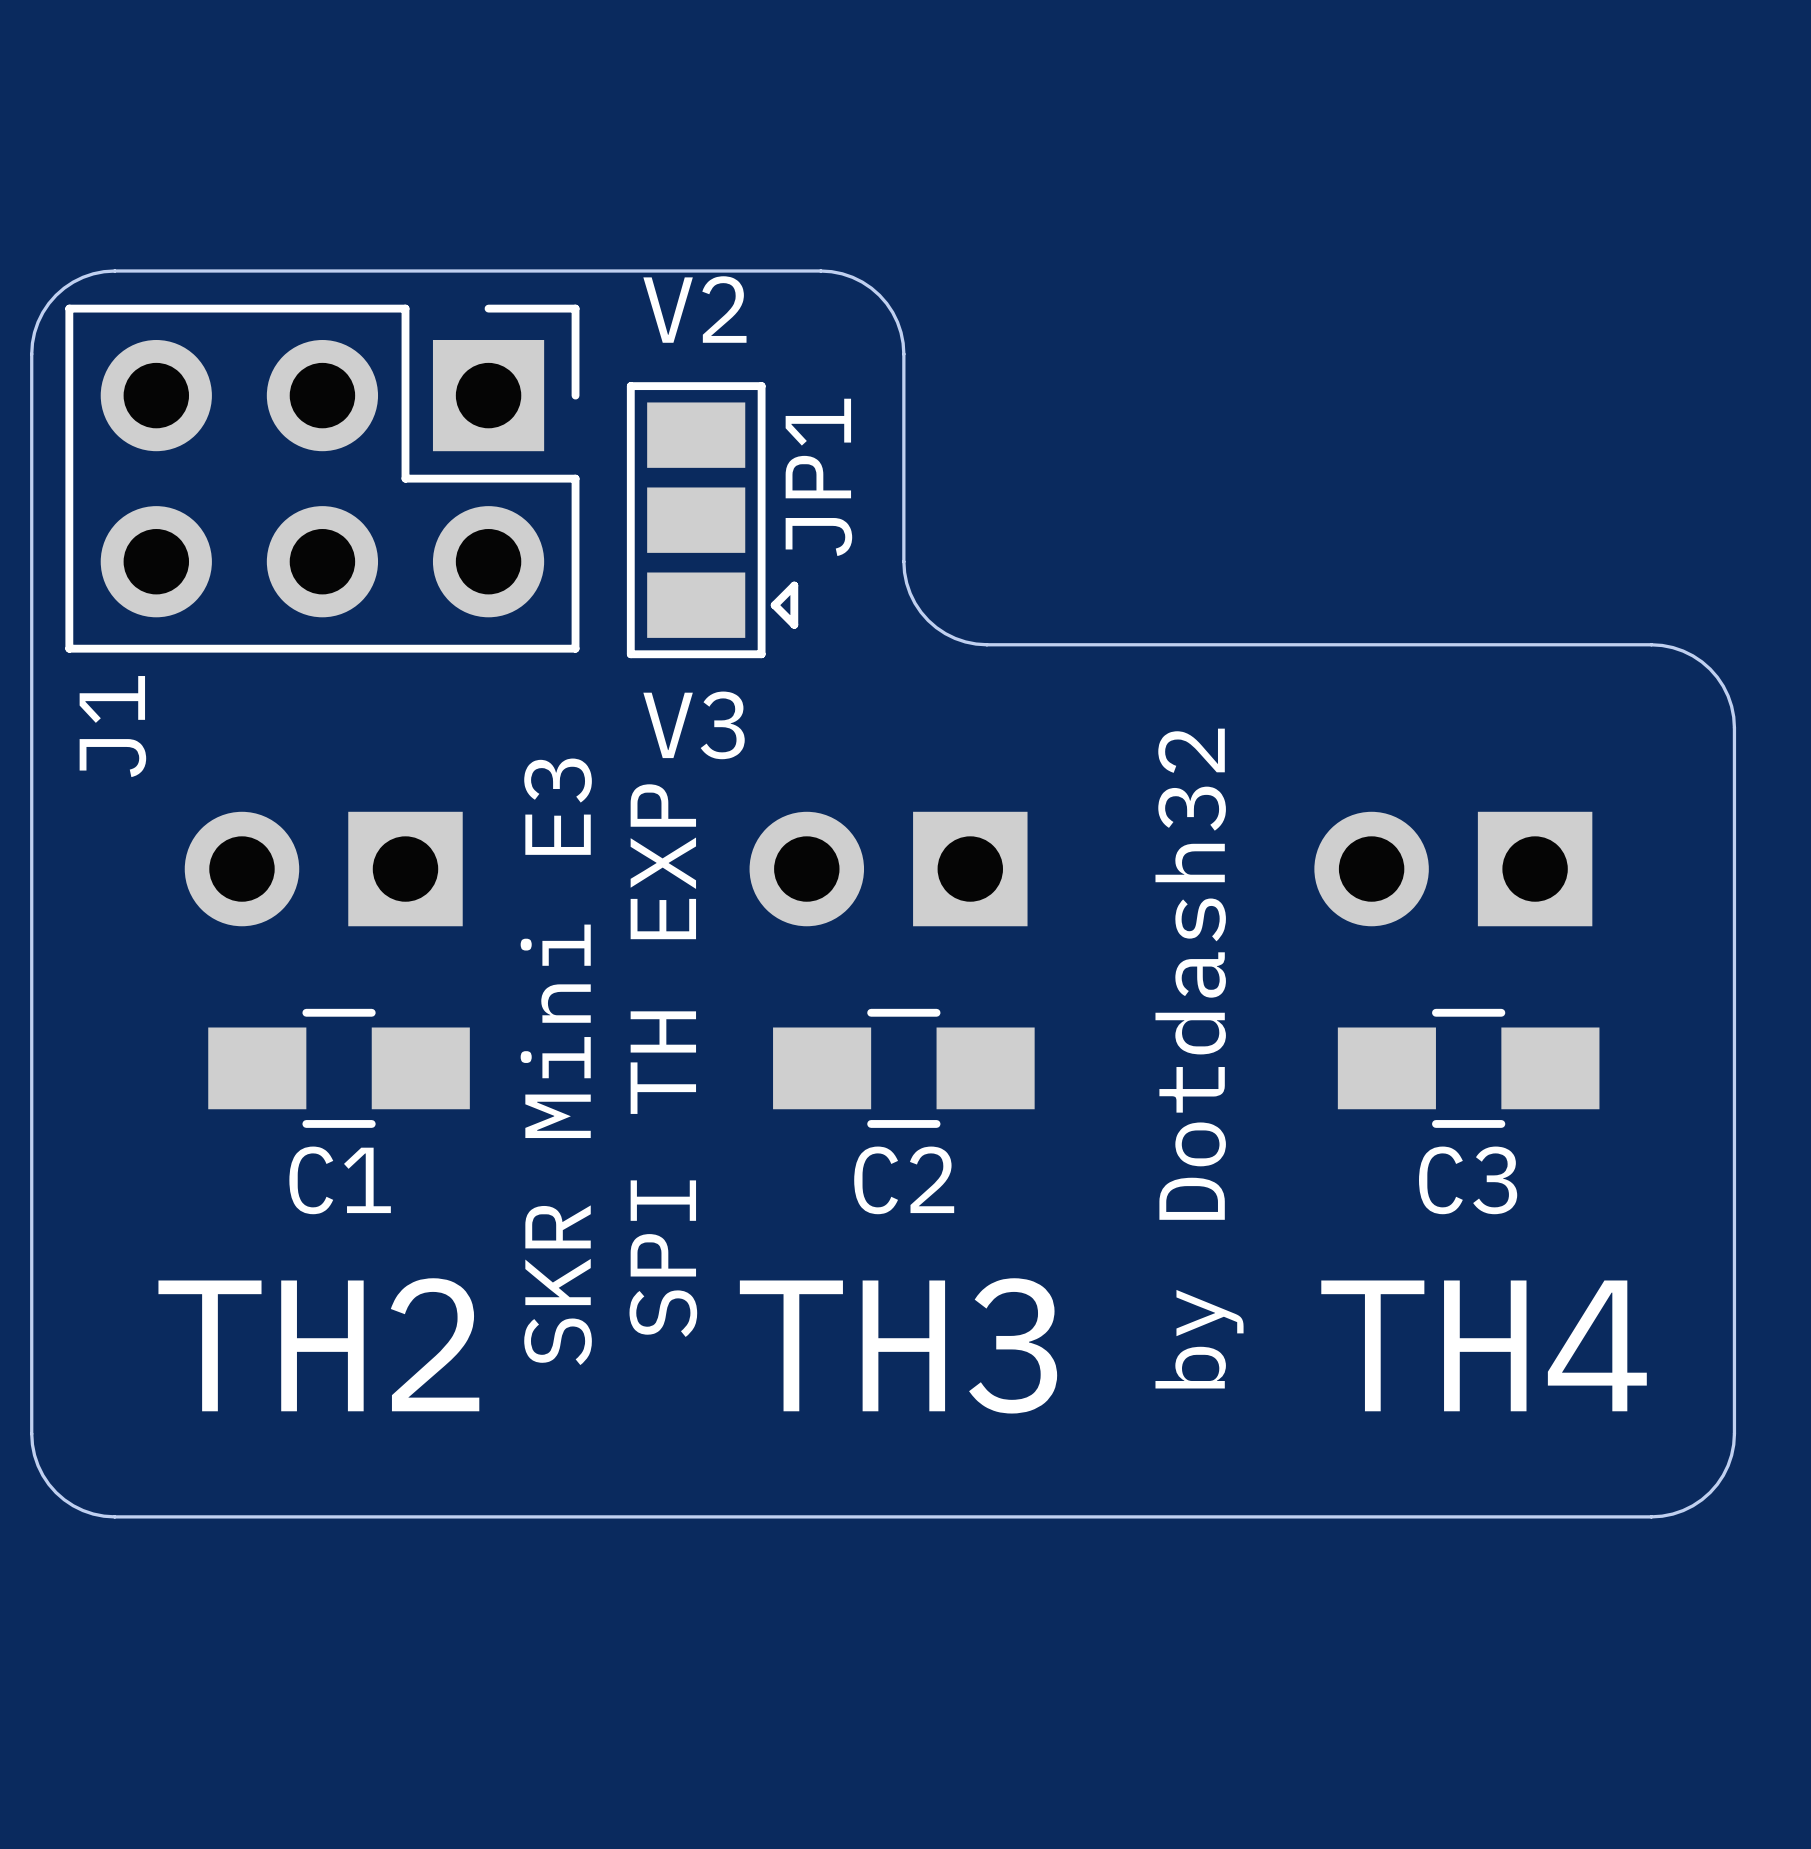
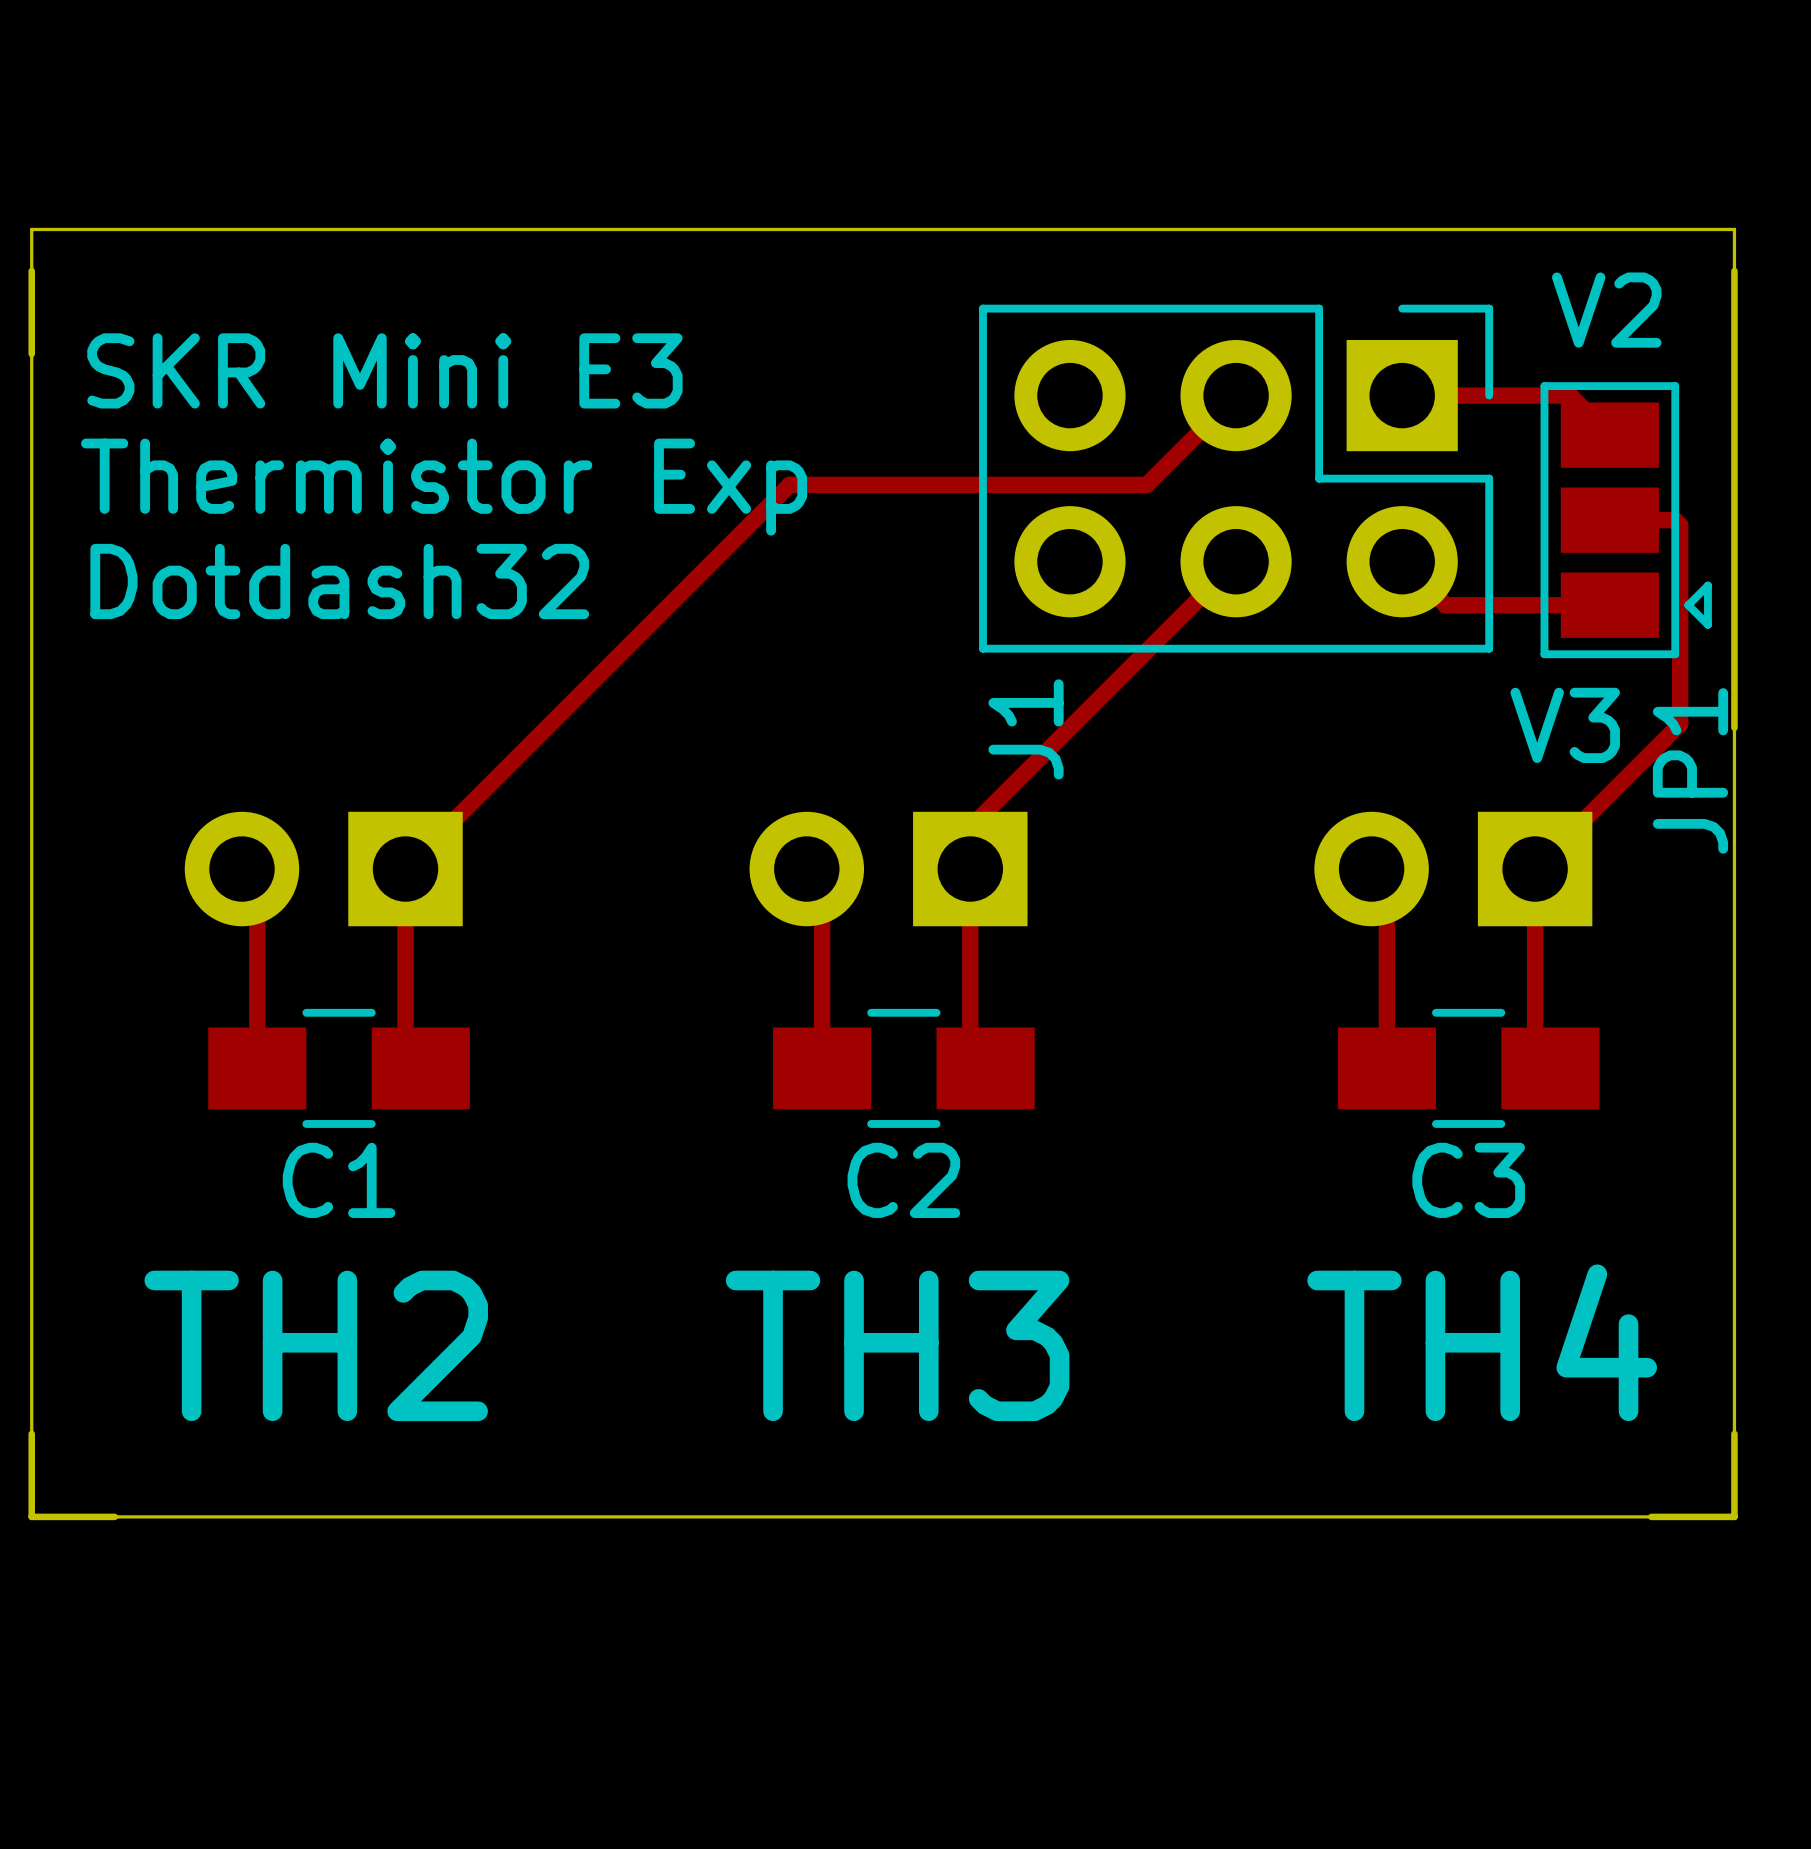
text position: V2 (694, 309) -> V2 (1606, 310)
board edge: (31, 354) (34, 332) (48, 303) (73, 282) (103, 271) (820, 271) (842, 273) (862, 282) (879, 295) (892, 312) (901, 332) (903, 354) (904, 572) (914, 603) (928, 620) (945, 633) (965, 641) (986, 644) (1662, 645) (1692, 655) (1717, 677) (1731, 706) (1734, 727) -> (31, 354) (31, 229) (1734, 229) (1734, 727)
track: none -> (1236, 395) (1146, 484) (789, 484) (405, 869) (405, 1053) (420, 1068)
track: none -> (1402, 395) (1570, 395) (1609, 435)
JP1 name position: JP1 (818, 477) -> JP1 (1690, 770)
J1 position: (322, 478) -> (1236, 478)
text: none -> Thermistor Exp (444, 487)
JP1 position: (712, 520) -> (1626, 520)
track: none -> (1609, 520) (1675, 520) (1680, 525) (1680, 723) (1535, 869) (1535, 1053) (1550, 1068)
track: none -> (1236, 561) (970, 827) (970, 1053) (985, 1068)
track: none -> (1402, 561) (1445, 605) (1609, 605)
text: none -> Dotdash32 (339, 581)
text position: V3 (694, 725) -> V3 (1565, 725)
track: none -> (241, 869) (257, 884) (257, 1068)
track: none -> (806, 869) (822, 884) (822, 1068)
track: none -> (1371, 869) (1386, 884) (1386, 1068)
text: by Dotdash32 (1199, 1058) -> none
text: SPI TH EXP (663, 1060) -> none
text rotation: 0° (556, 1061) -> 90° clockwise (384, 370)
board edge: (31, 1433) (38, 1465) (56, 1492) (83, 1510) (114, 1516) -> (31, 1433) (31, 1516) (114, 1516)
board edge: (1734, 1433) (1728, 1465) (1710, 1492) (1683, 1510) (1651, 1516) -> (1734, 1433) (1734, 1516) (1651, 1516)

